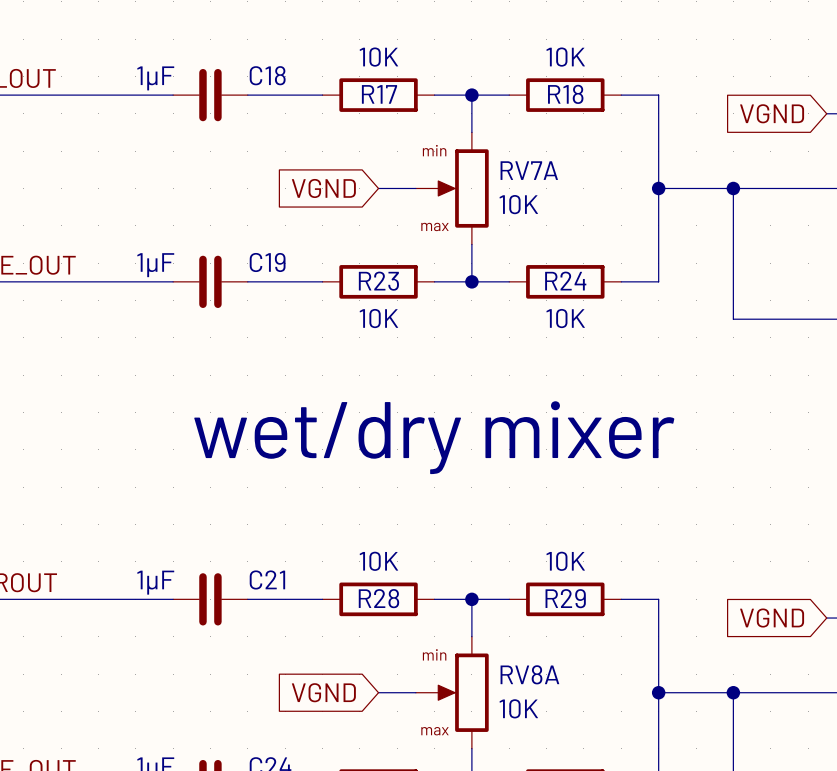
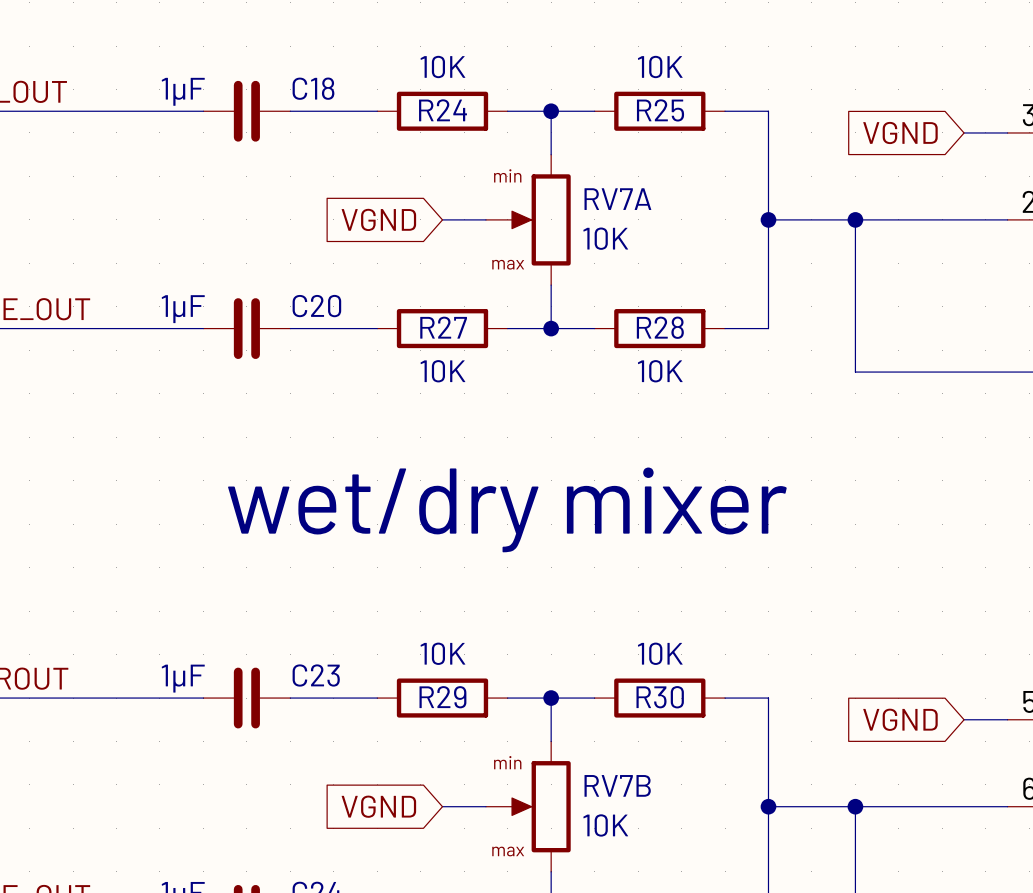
R17 name: R17 (379, 94) -> R24 (443, 110)
R18 name: R18 (565, 94) -> R25 (660, 110)
C19 name: C19 (267, 262) -> C20 (316, 306)
R23 name: R23 (378, 281) -> R27 (443, 327)
R24 name: R24 (565, 281) -> R28 (660, 327)
C21 name: C21 (267, 579) -> C23 (316, 675)
R28 name: R28 (378, 598) -> R29 (442, 697)
R29 name: R29 (565, 598) -> R30 (660, 697)
RV8A name: RV8A (529, 674) -> RV7B (617, 785)

